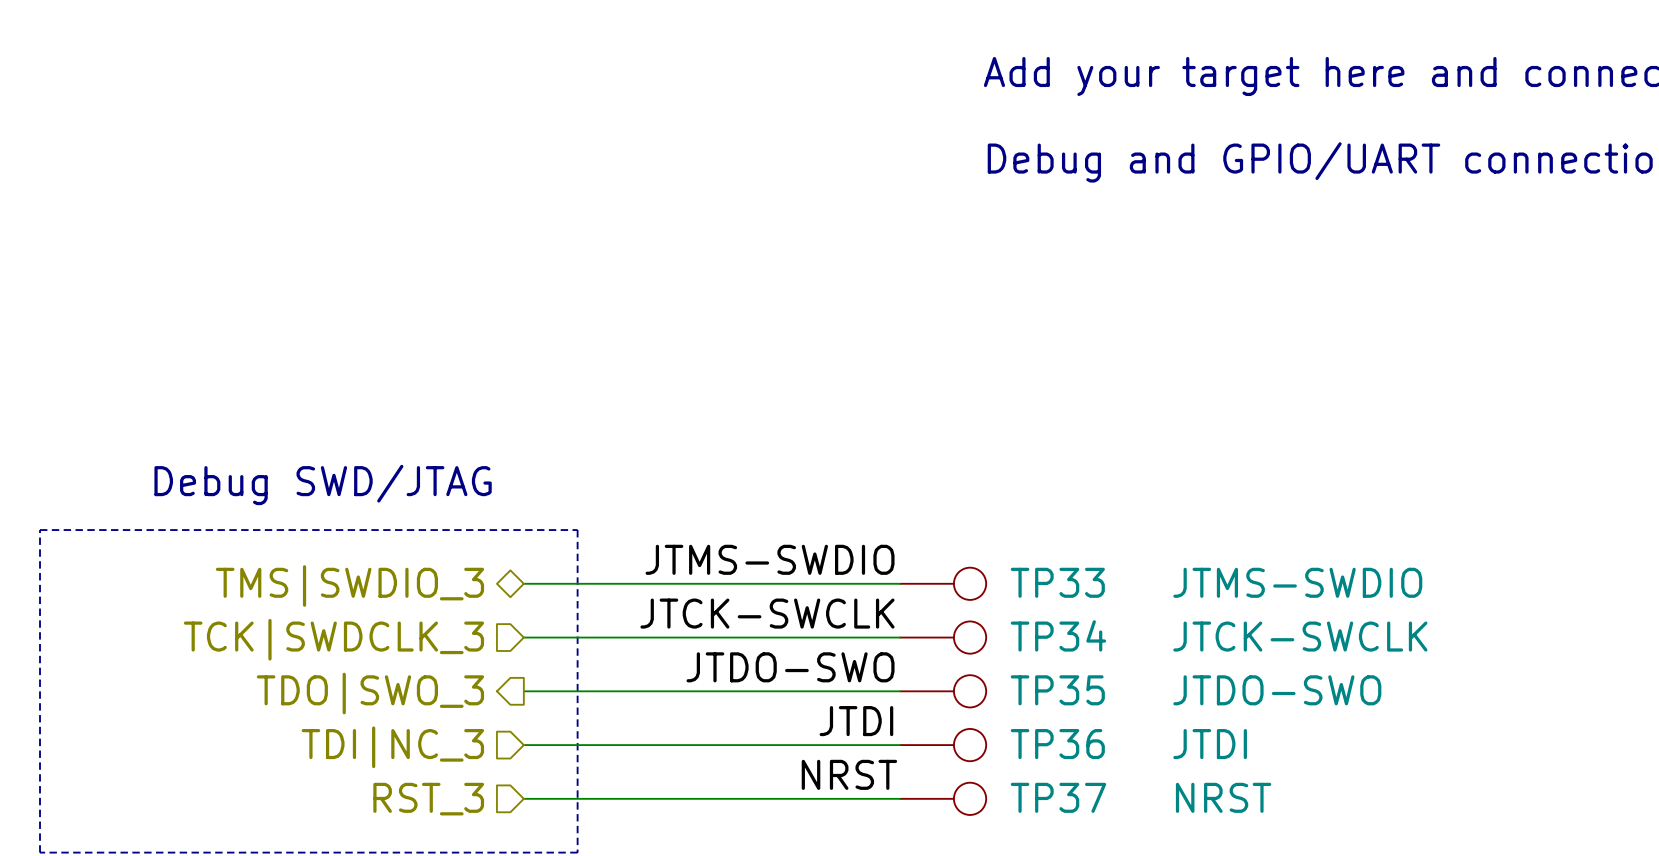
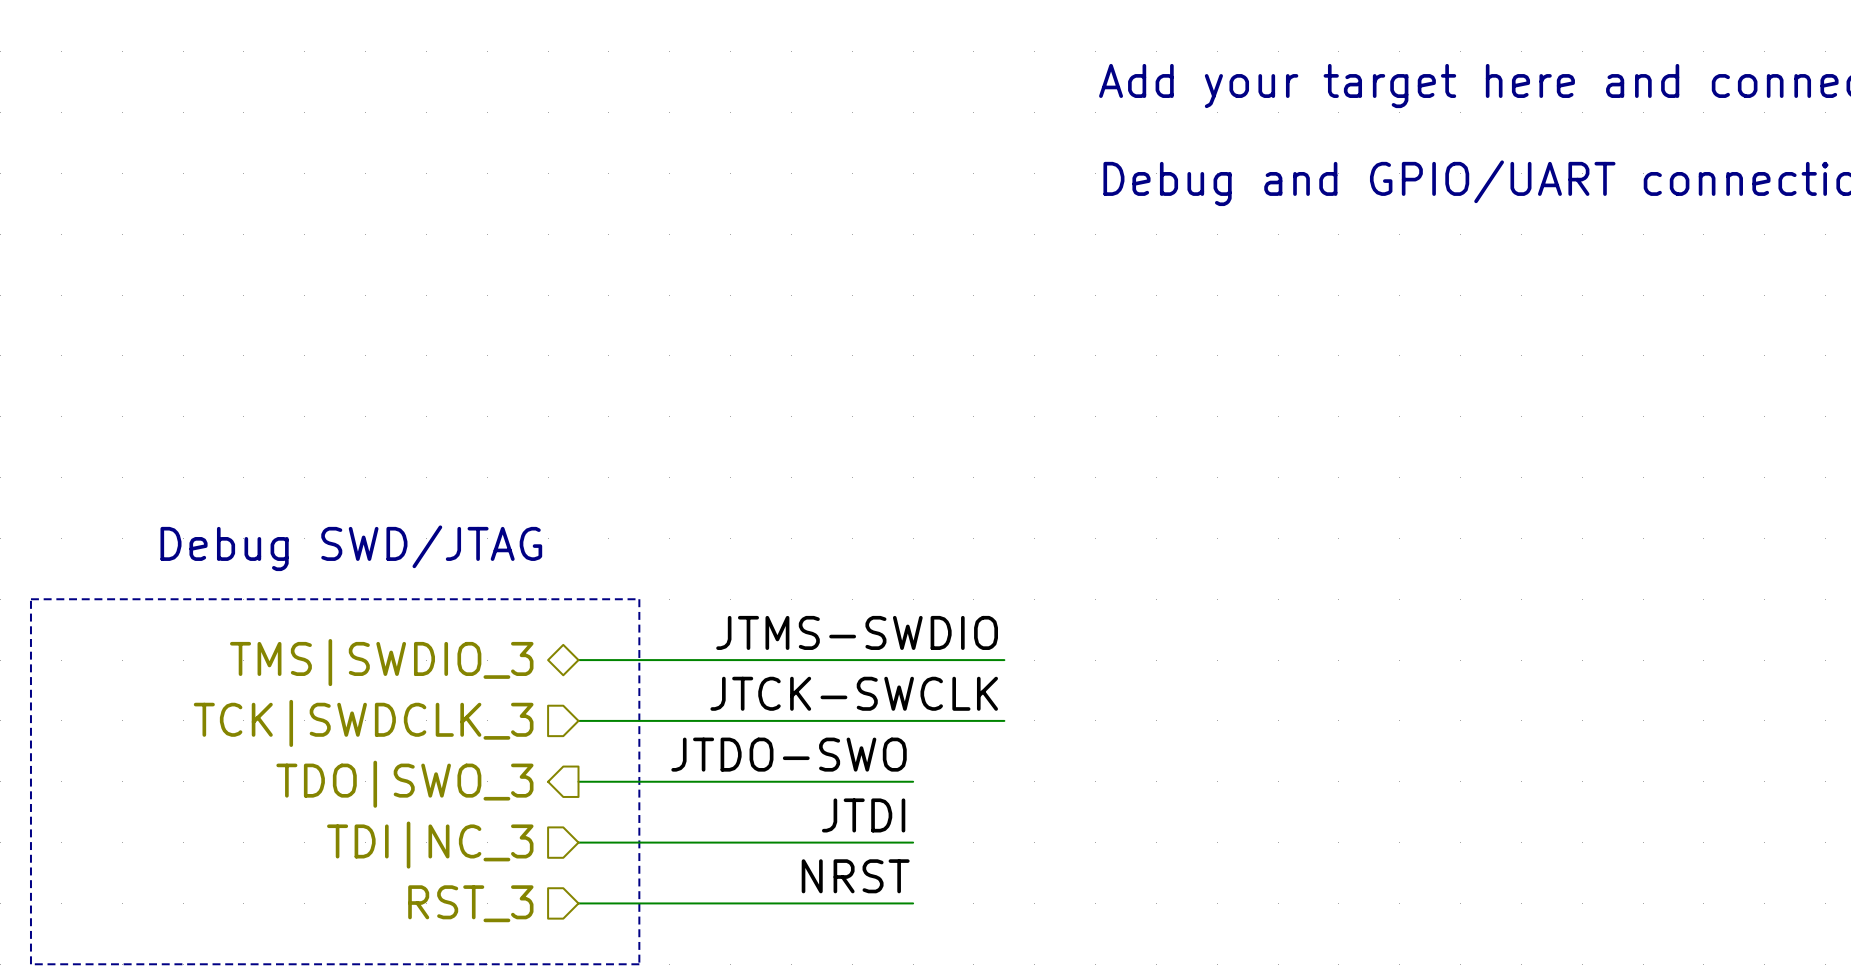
TP33: JTMS-SWDIO (943, 583) -> none
TP34: JTCK-SWCLK (943, 637) -> none
label position: JTDO-SWO (790, 667) -> JTDO-SWO (789, 754)
wire: (819, 691) (900, 691) -> none
TP35: JTDO-SWO (943, 691) -> none
label position: JTDI (856, 721) -> JTDI (863, 815)
wire: (819, 745) (900, 745) -> none
TP36: JTDI (943, 745) -> none
label position: NRST (849, 774) -> NRST (855, 876)
wire: (819, 798) (900, 798) -> none
TP37: NRST (943, 798) -> none

